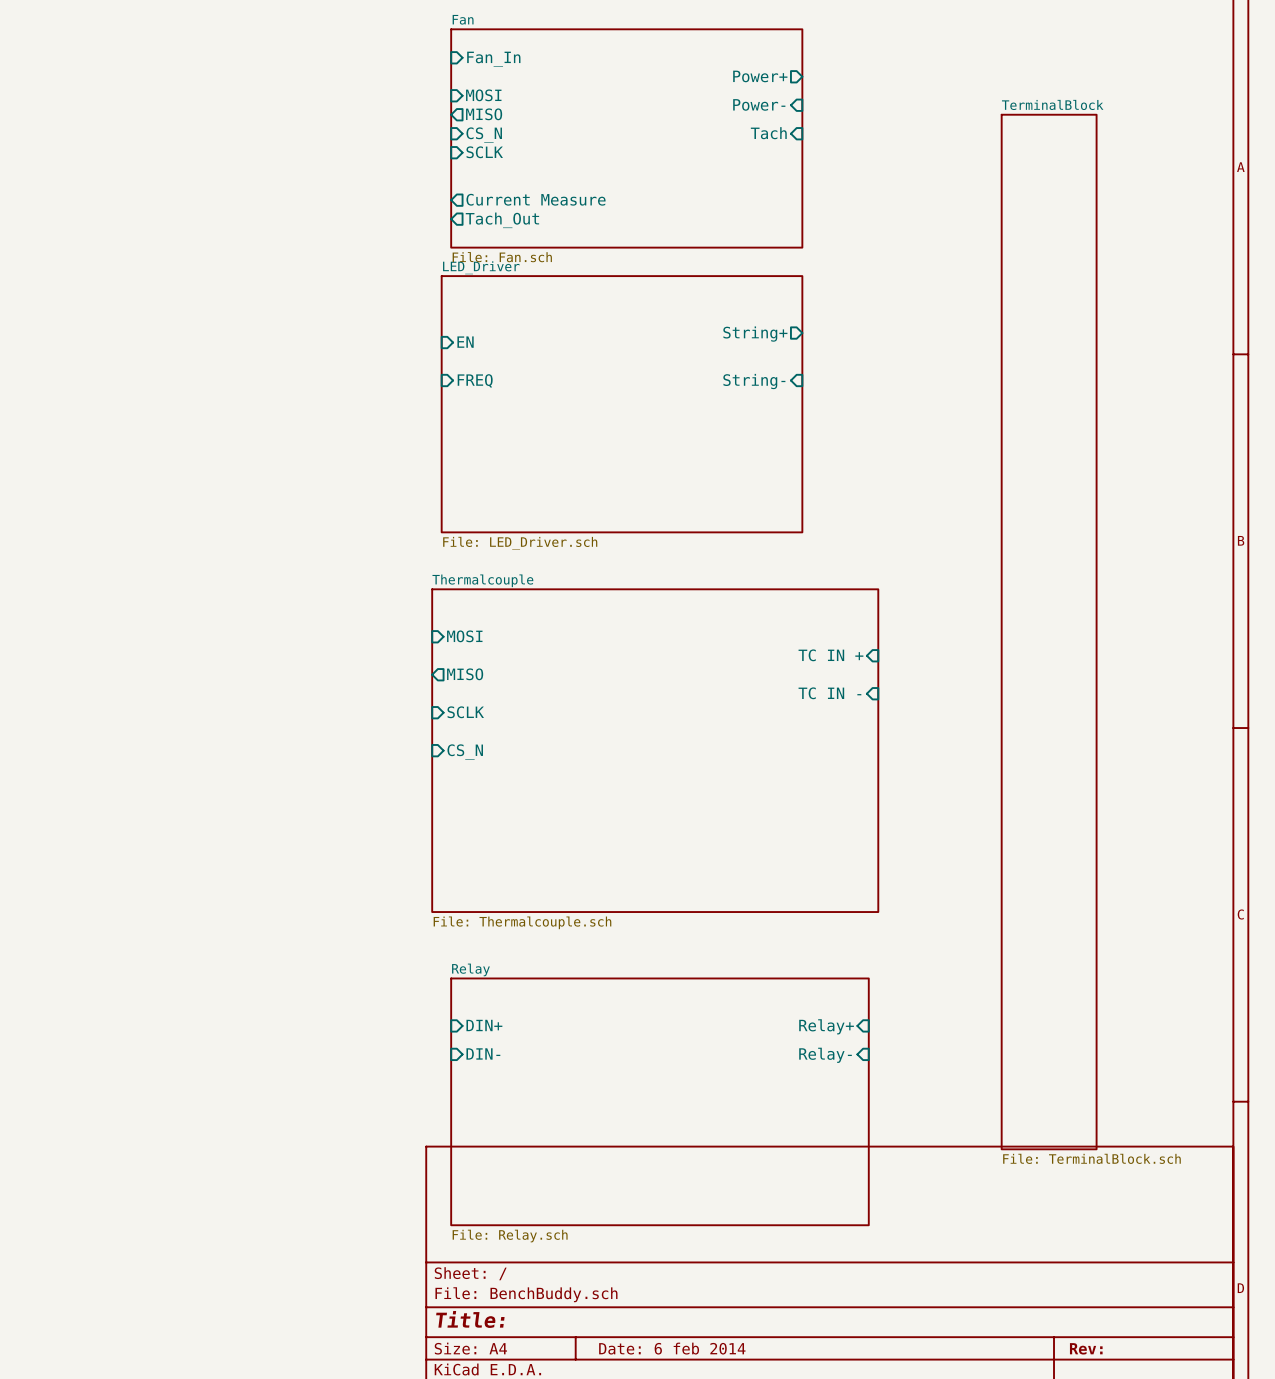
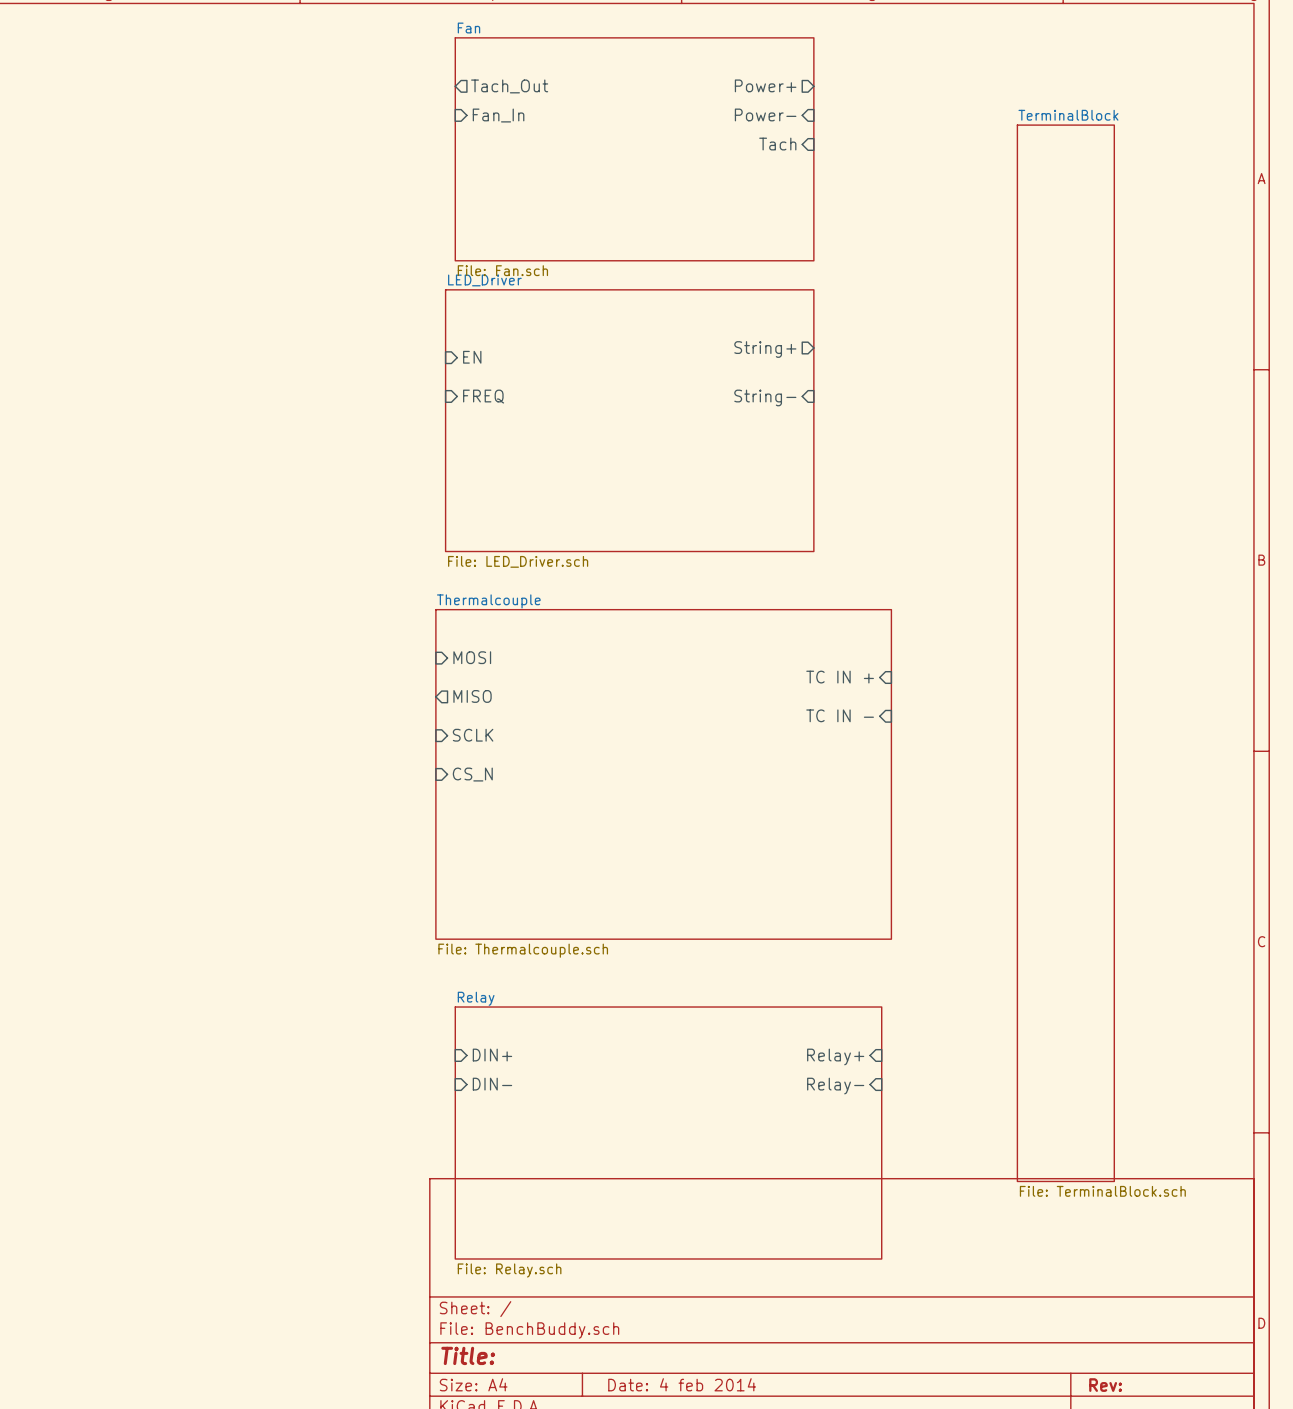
sheet pin position: Fan_In (493, 59) -> Fan_In (498, 115)
sheet pin: MOSI (483, 95) -> none
sheet pin: MISO (484, 114) -> none
sheet pin: CS_N (484, 135) -> none
sheet pin: SCLK (484, 152) -> none
sheet pin: Current Measure (536, 199) -> none
sheet pin position: Tach_Out (502, 220) -> Tach_Out (509, 86)
title block: Date: 6 feb 2014 (672, 1348) -> Date: 4 feb 2014 (682, 1384)

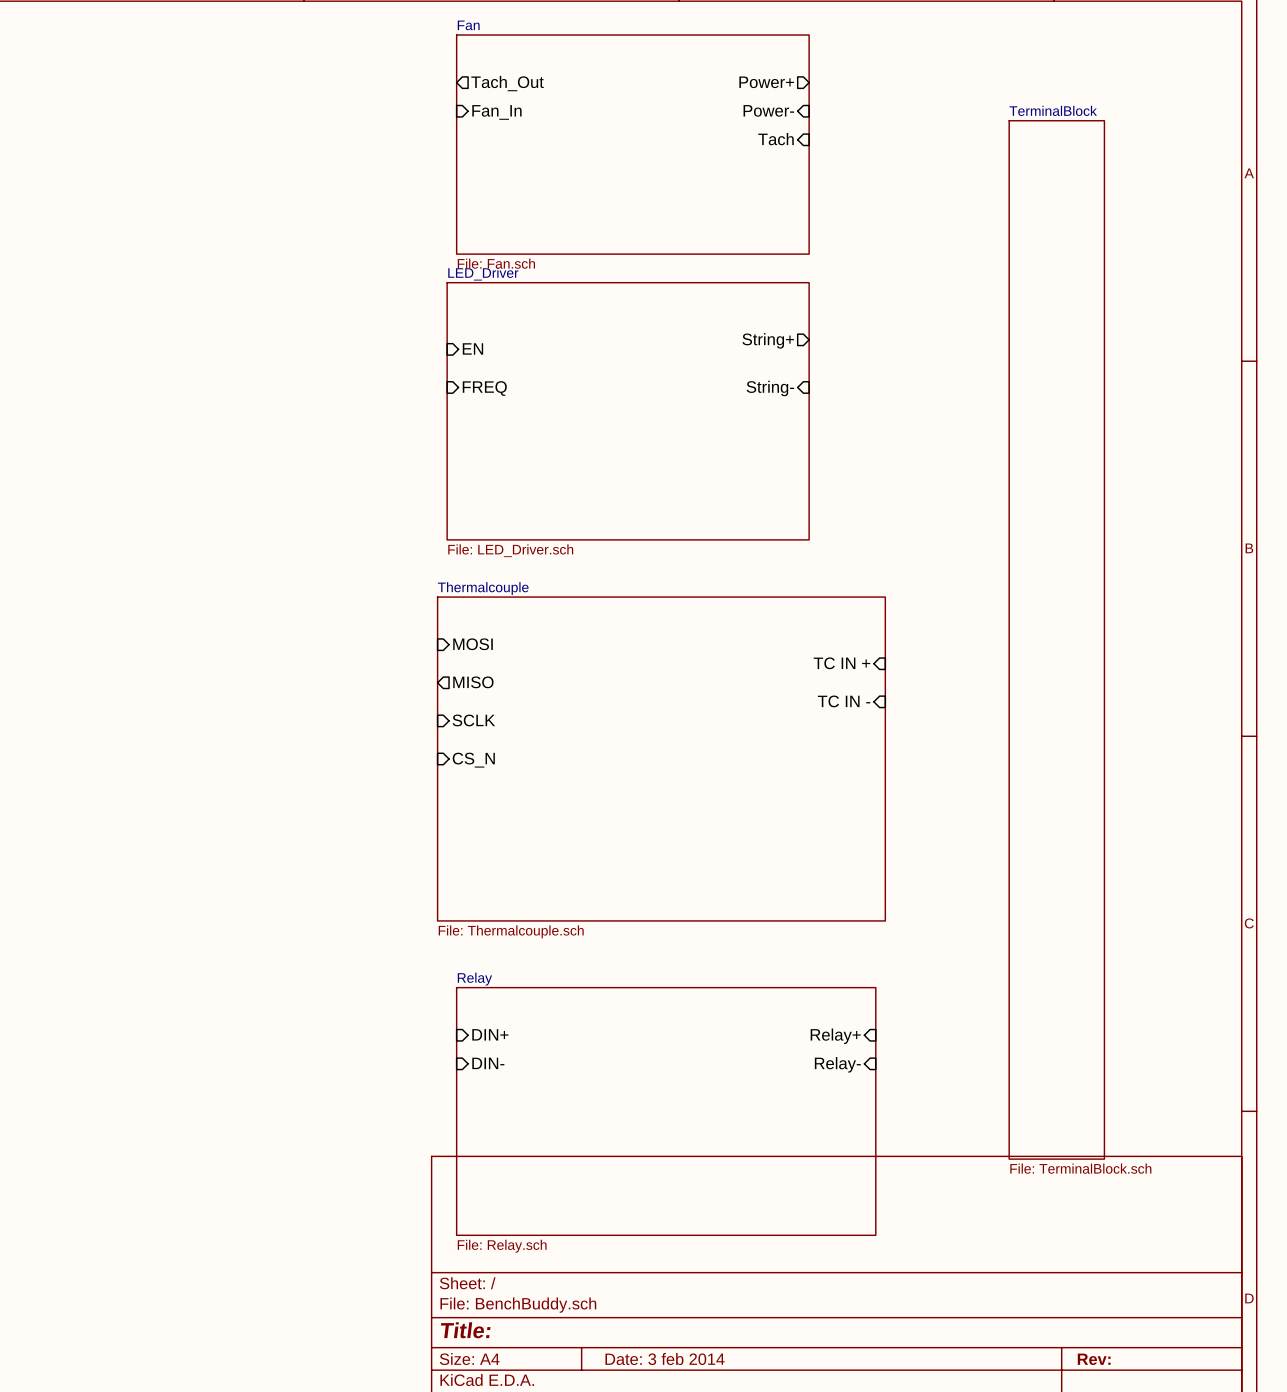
title block: Date: 4 feb 2014 (682, 1384) -> Date: 3 feb 2014 (665, 1359)

